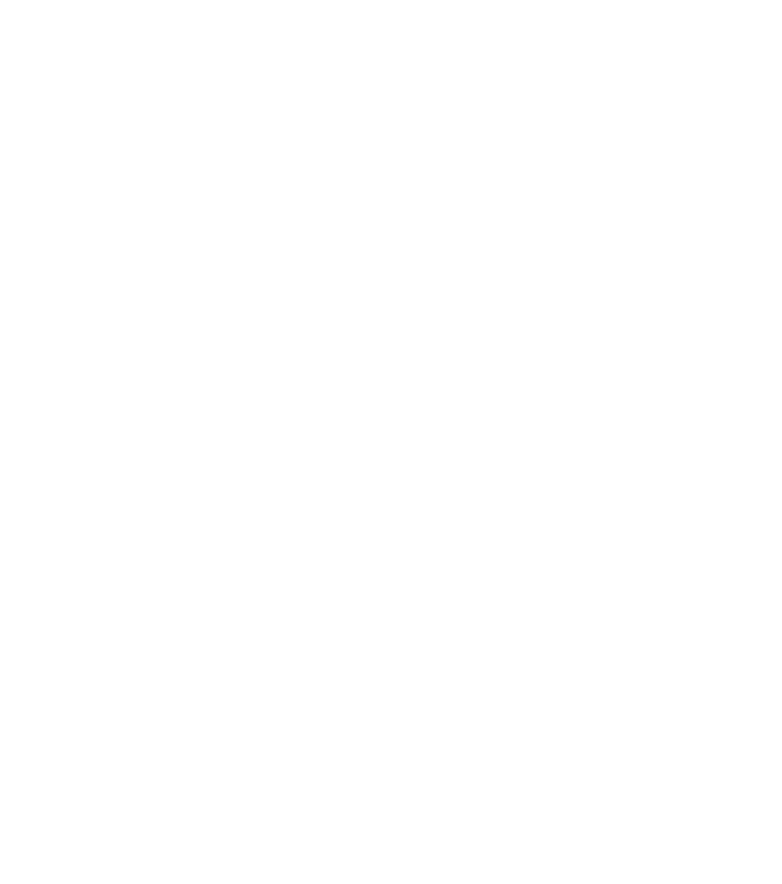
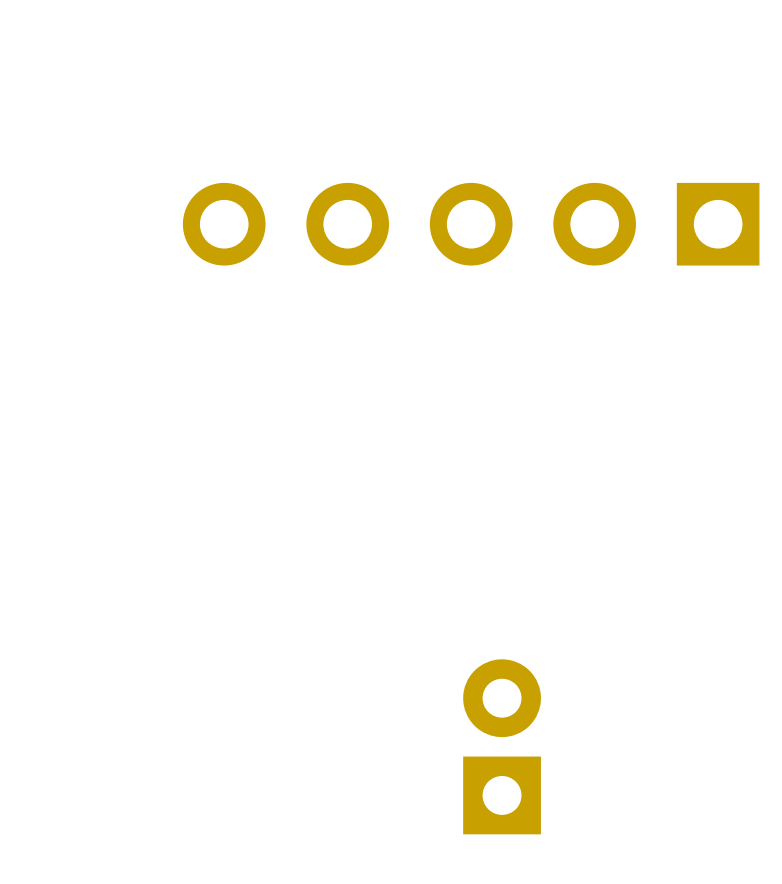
part: none -> (471, 224)
part: none -> (502, 746)

